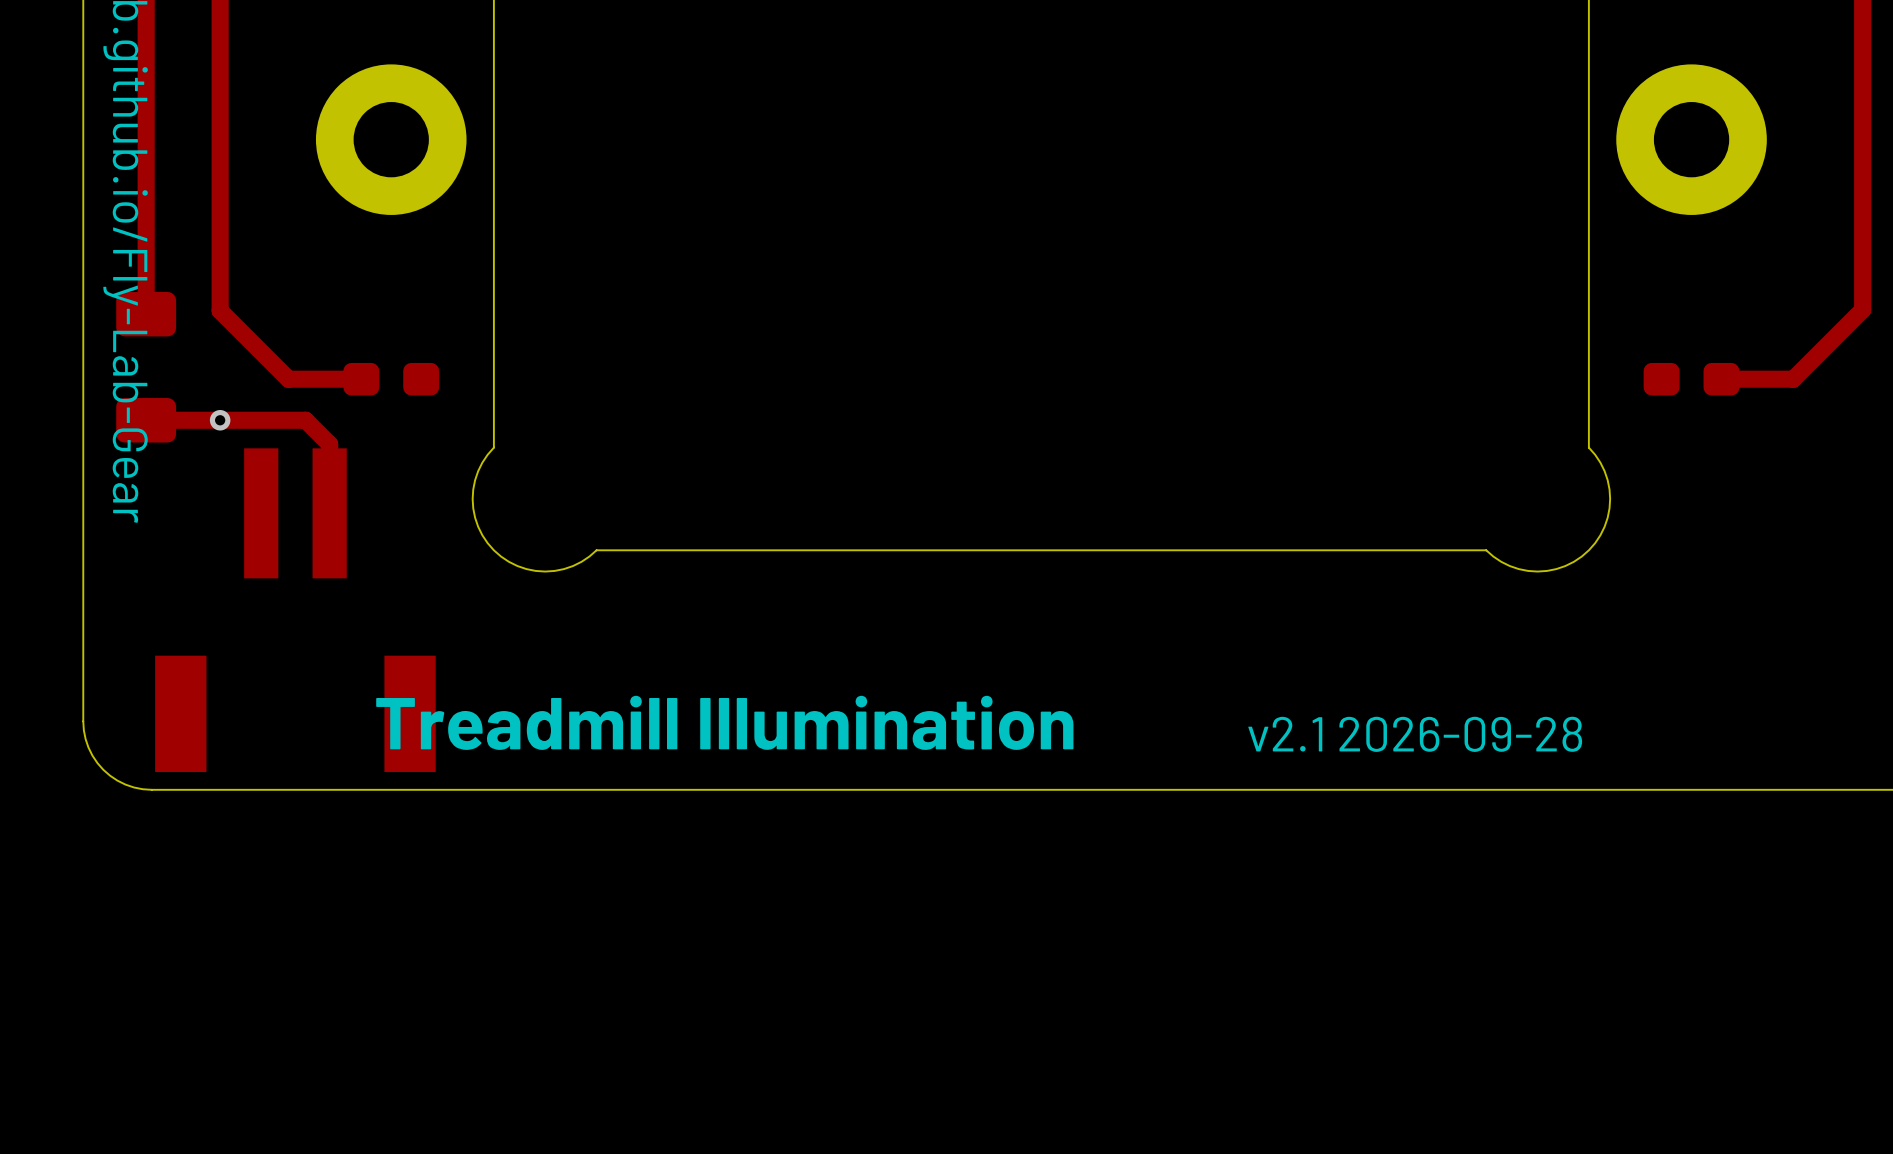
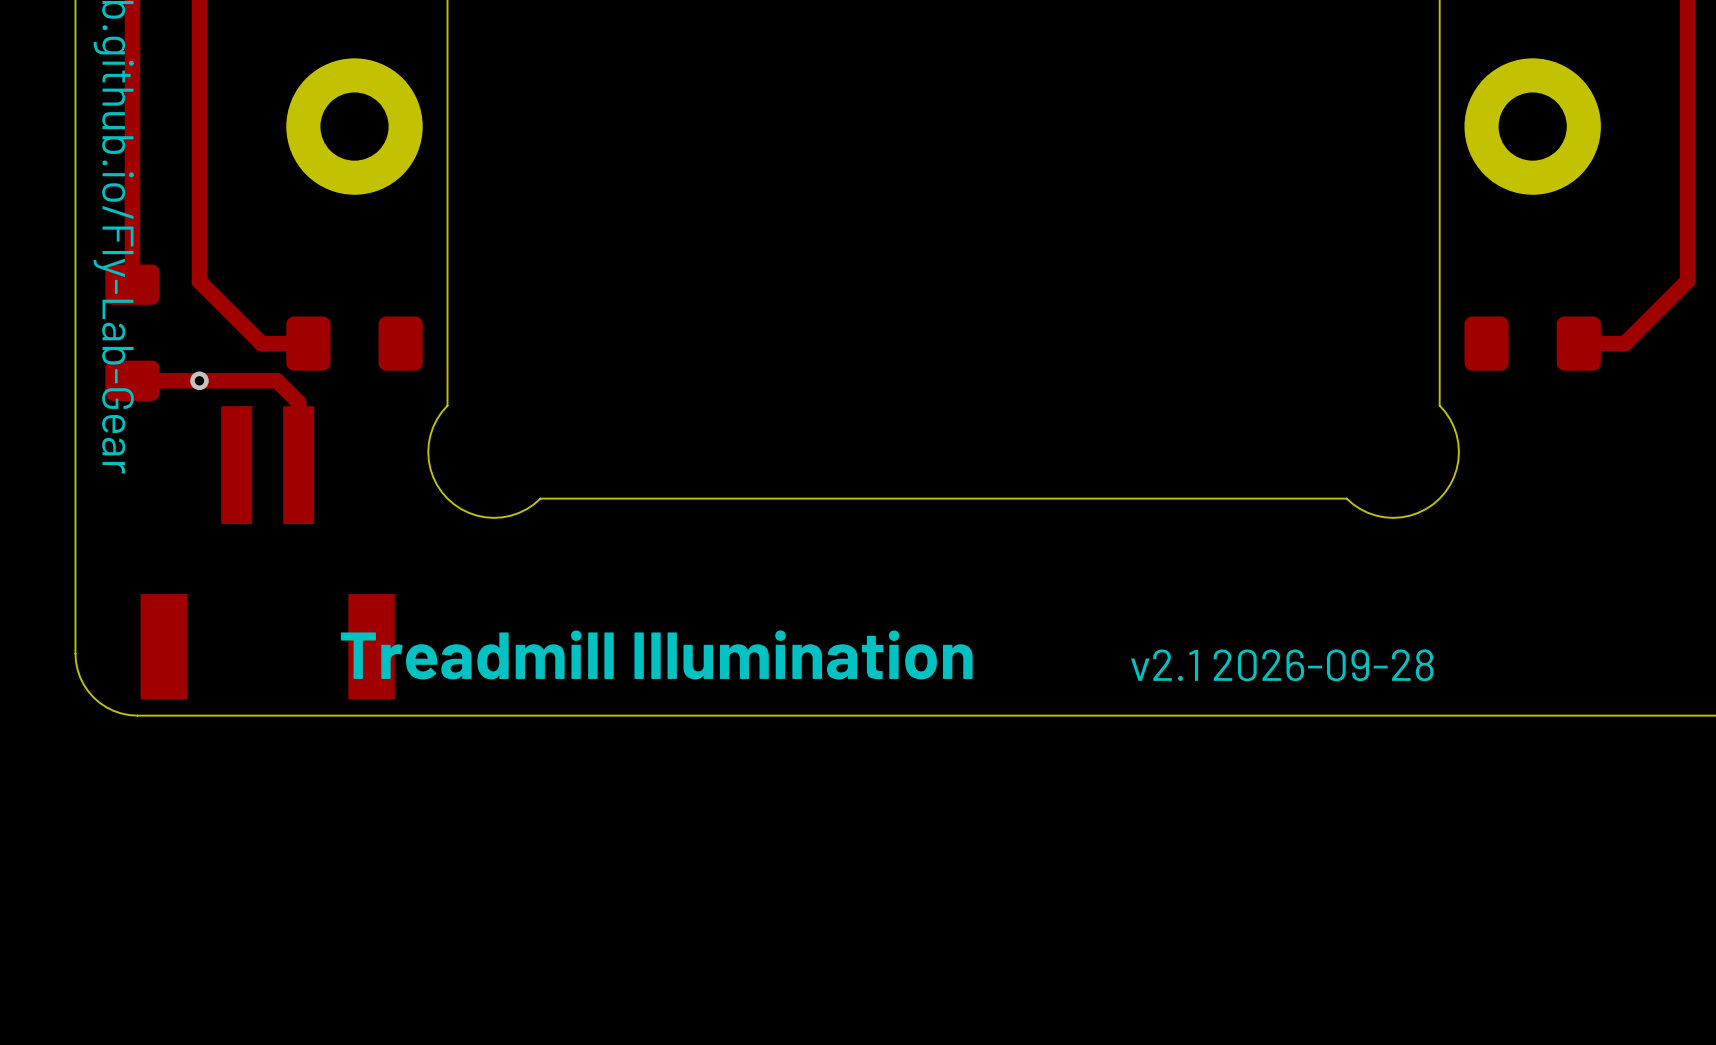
part footprint: [343, 362, 440, 396] -> [286, 316, 423, 371]
part footprint: [1643, 362, 1740, 396] -> [1464, 316, 1601, 371]

